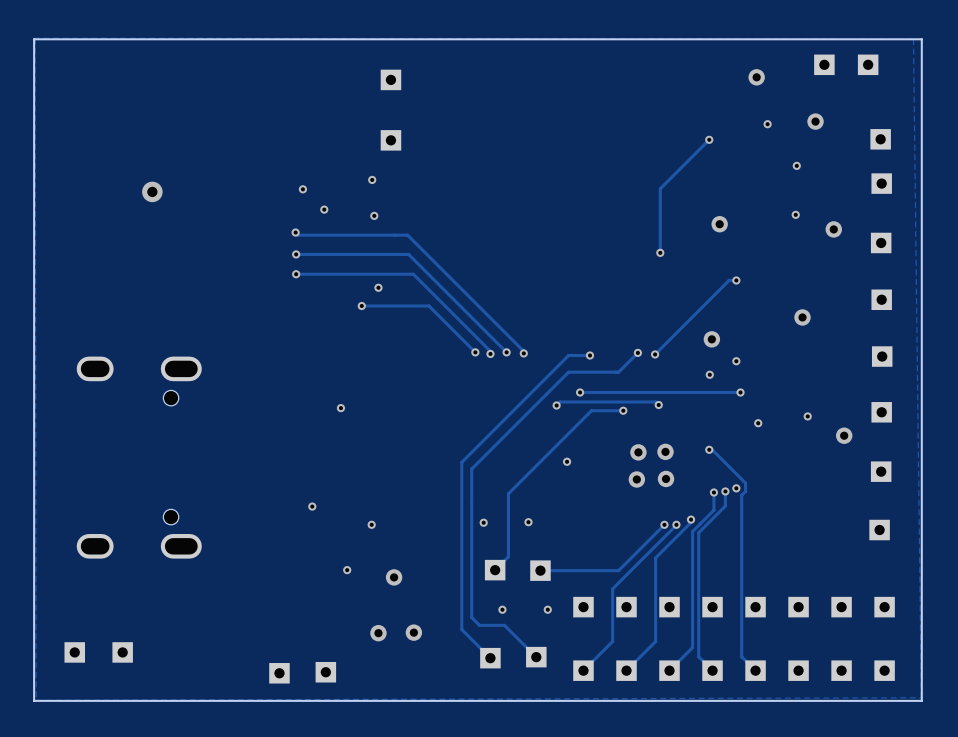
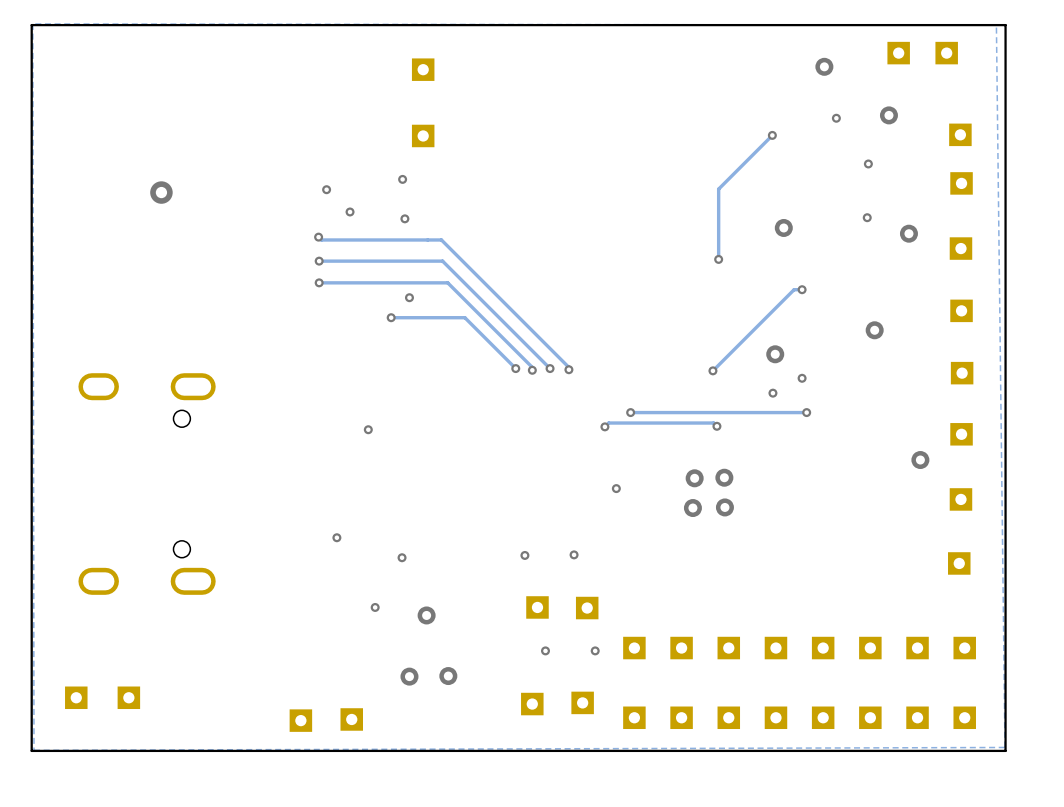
track: (637, 352) (618, 372) (568, 372) (471, 469) (471, 617) (479, 625) (504, 625) (536, 657) -> none
via: (637, 352) -> none
track: (589, 355) (568, 355) (461, 462) (461, 629) (490, 658) -> none
via: (589, 355) -> none
track: (623, 410) (591, 410) (508, 493) (508, 556) (495, 570) -> none
via: (623, 410) -> none
via: (807, 416) -> none
via: (758, 423) -> none
track: (709, 449) (712, 449) (745, 483) (745, 491) (741, 495) (741, 656) (755, 670) -> none
via: (709, 449) -> none
via: (736, 488) -> none
track: (725, 491) (725, 505) (698, 532) (698, 656) (712, 670) -> none
via: (725, 491) -> none
track: (713, 492) (713, 510) (692, 531) (692, 647) (669, 670) -> none
via: (713, 492) -> none
track: (691, 519) (691, 522) (655, 557) (655, 641) (626, 670) -> none
via: (691, 519) -> none
track: (664, 524) (618, 570) (540, 570) -> none
via: (664, 524) -> none
via: (676, 524) -> none
track: (676, 525) (612, 588) (612, 641) (583, 670) -> none

